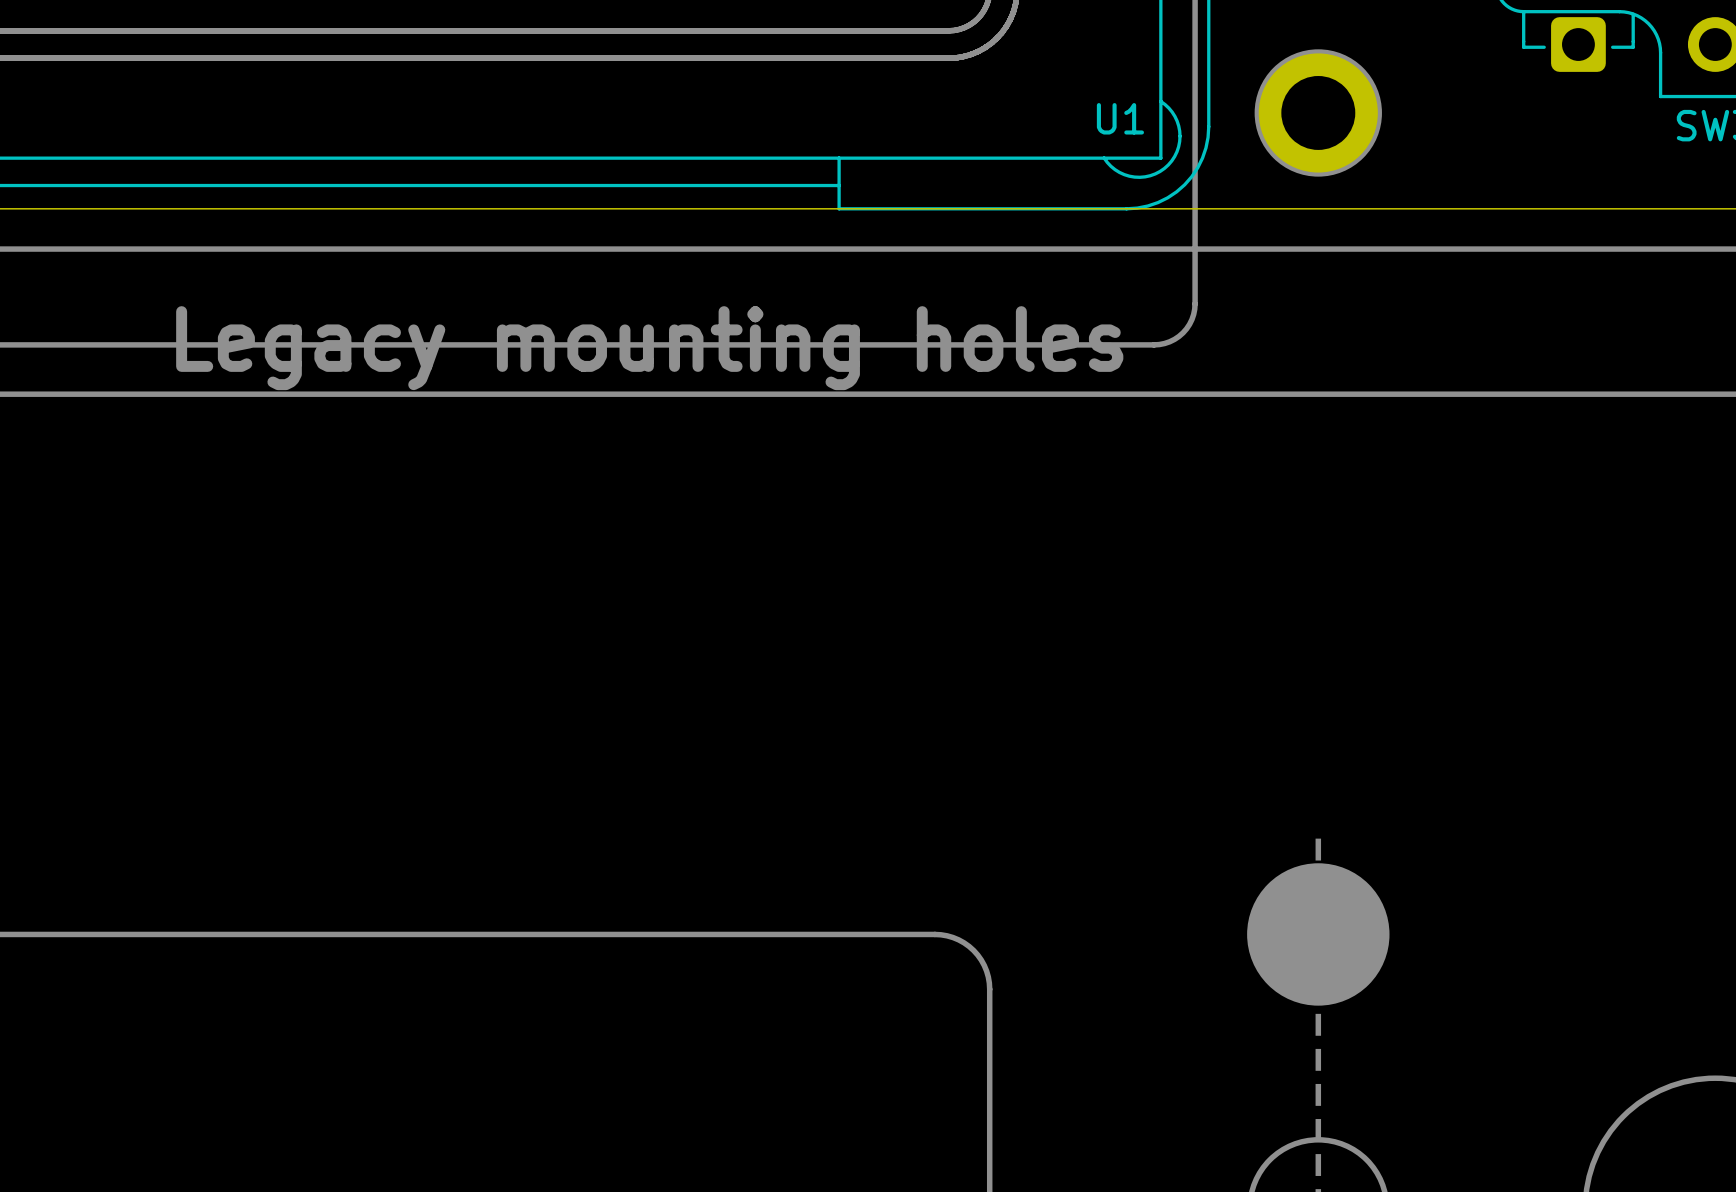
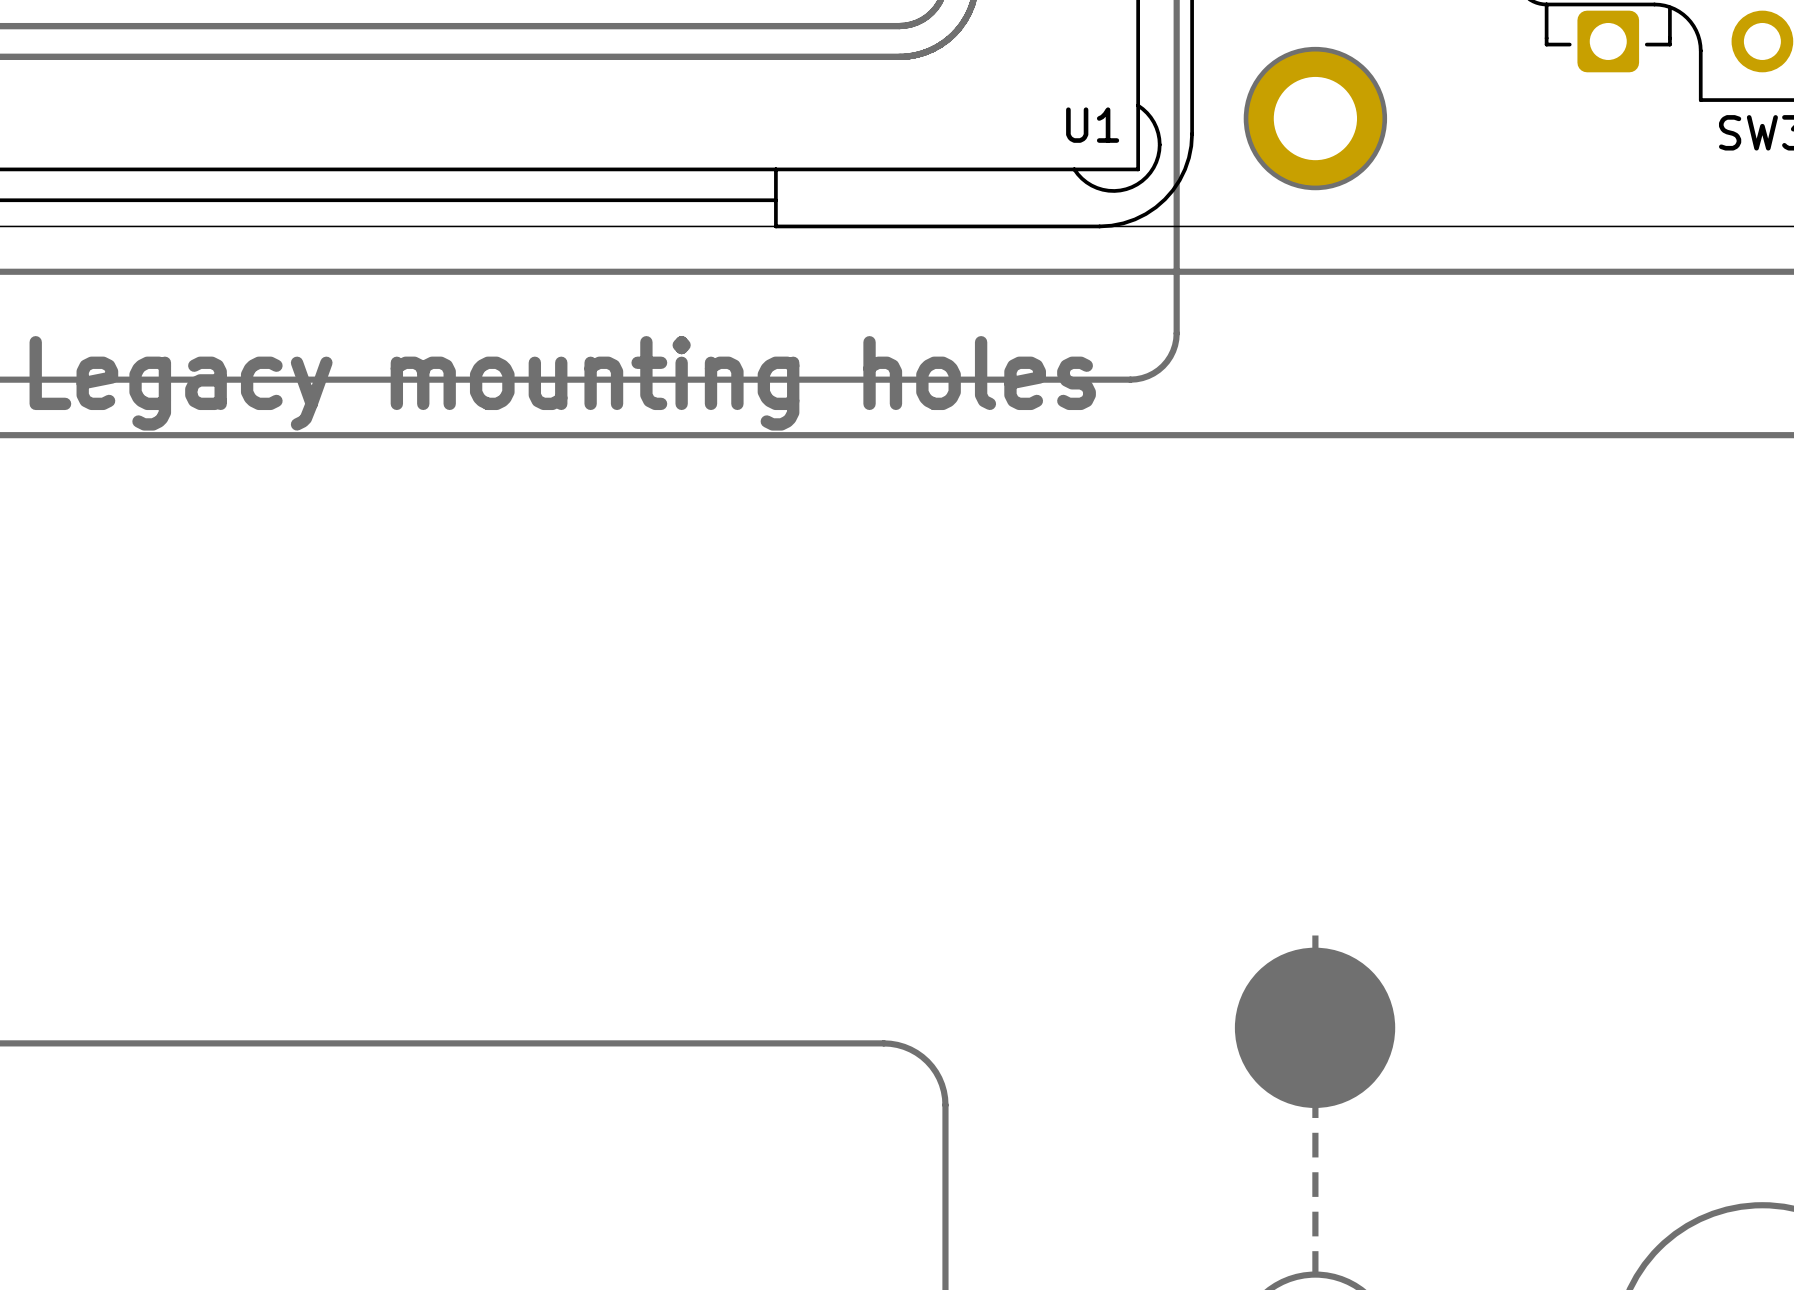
drawing position: (1318, 934) -> (1315, 1027)

